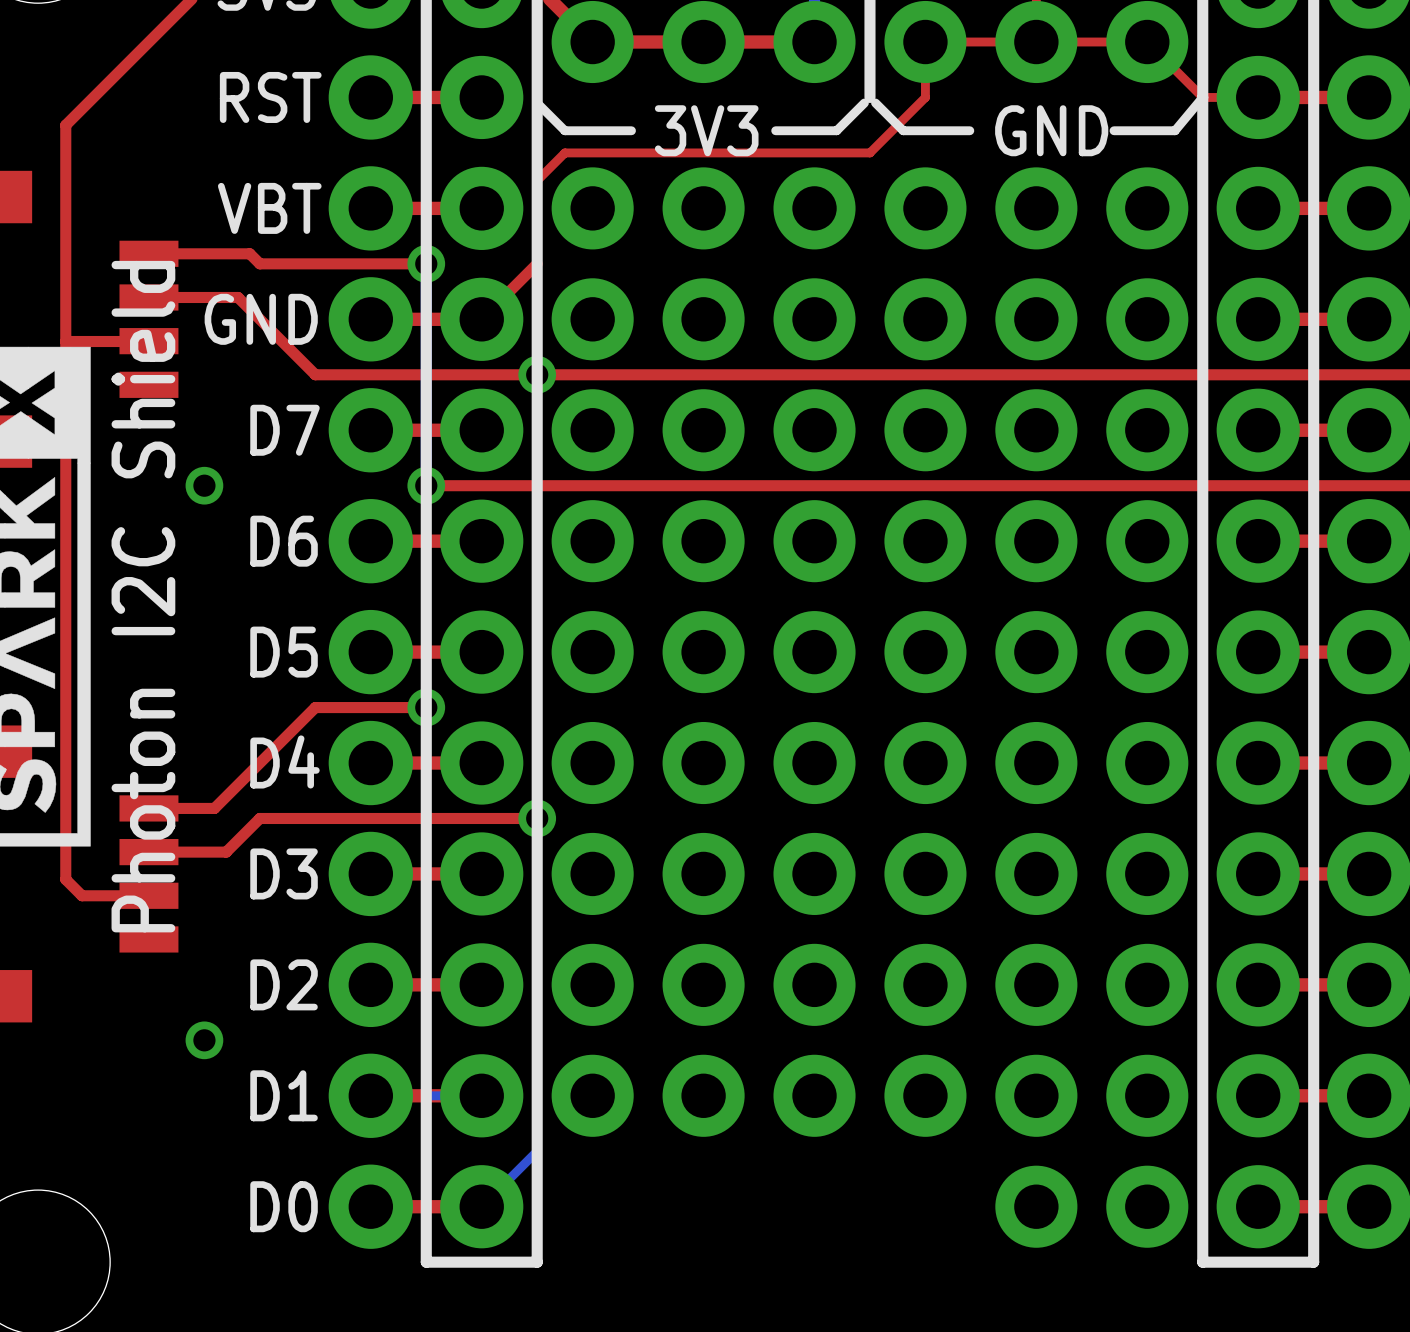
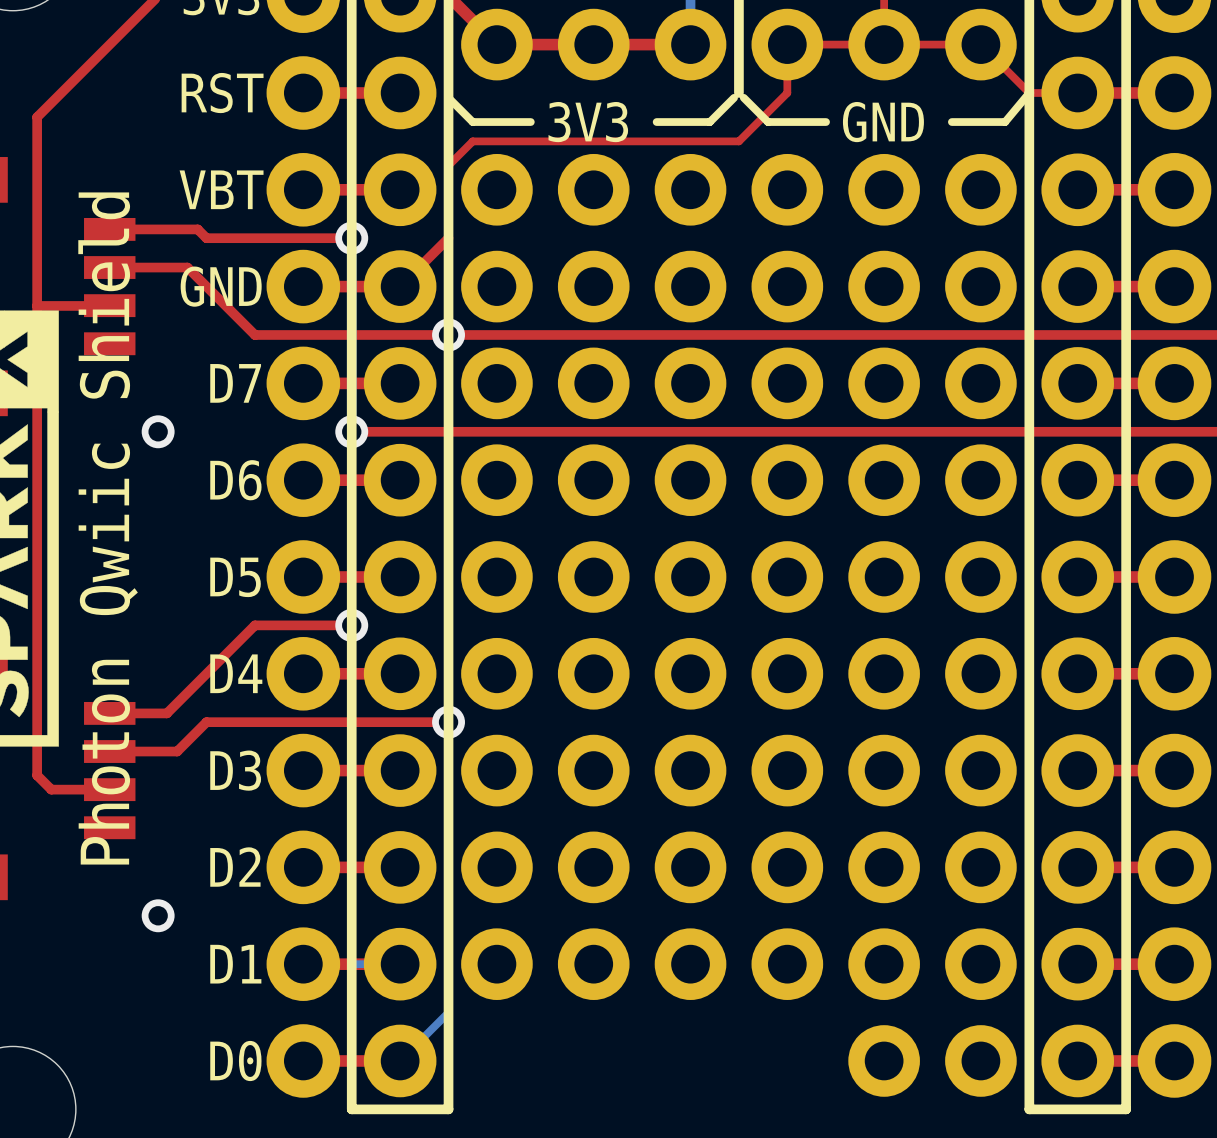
text: Photon I2C Shield (143, 596) -> Photon Qwiic Shield (108, 528)

